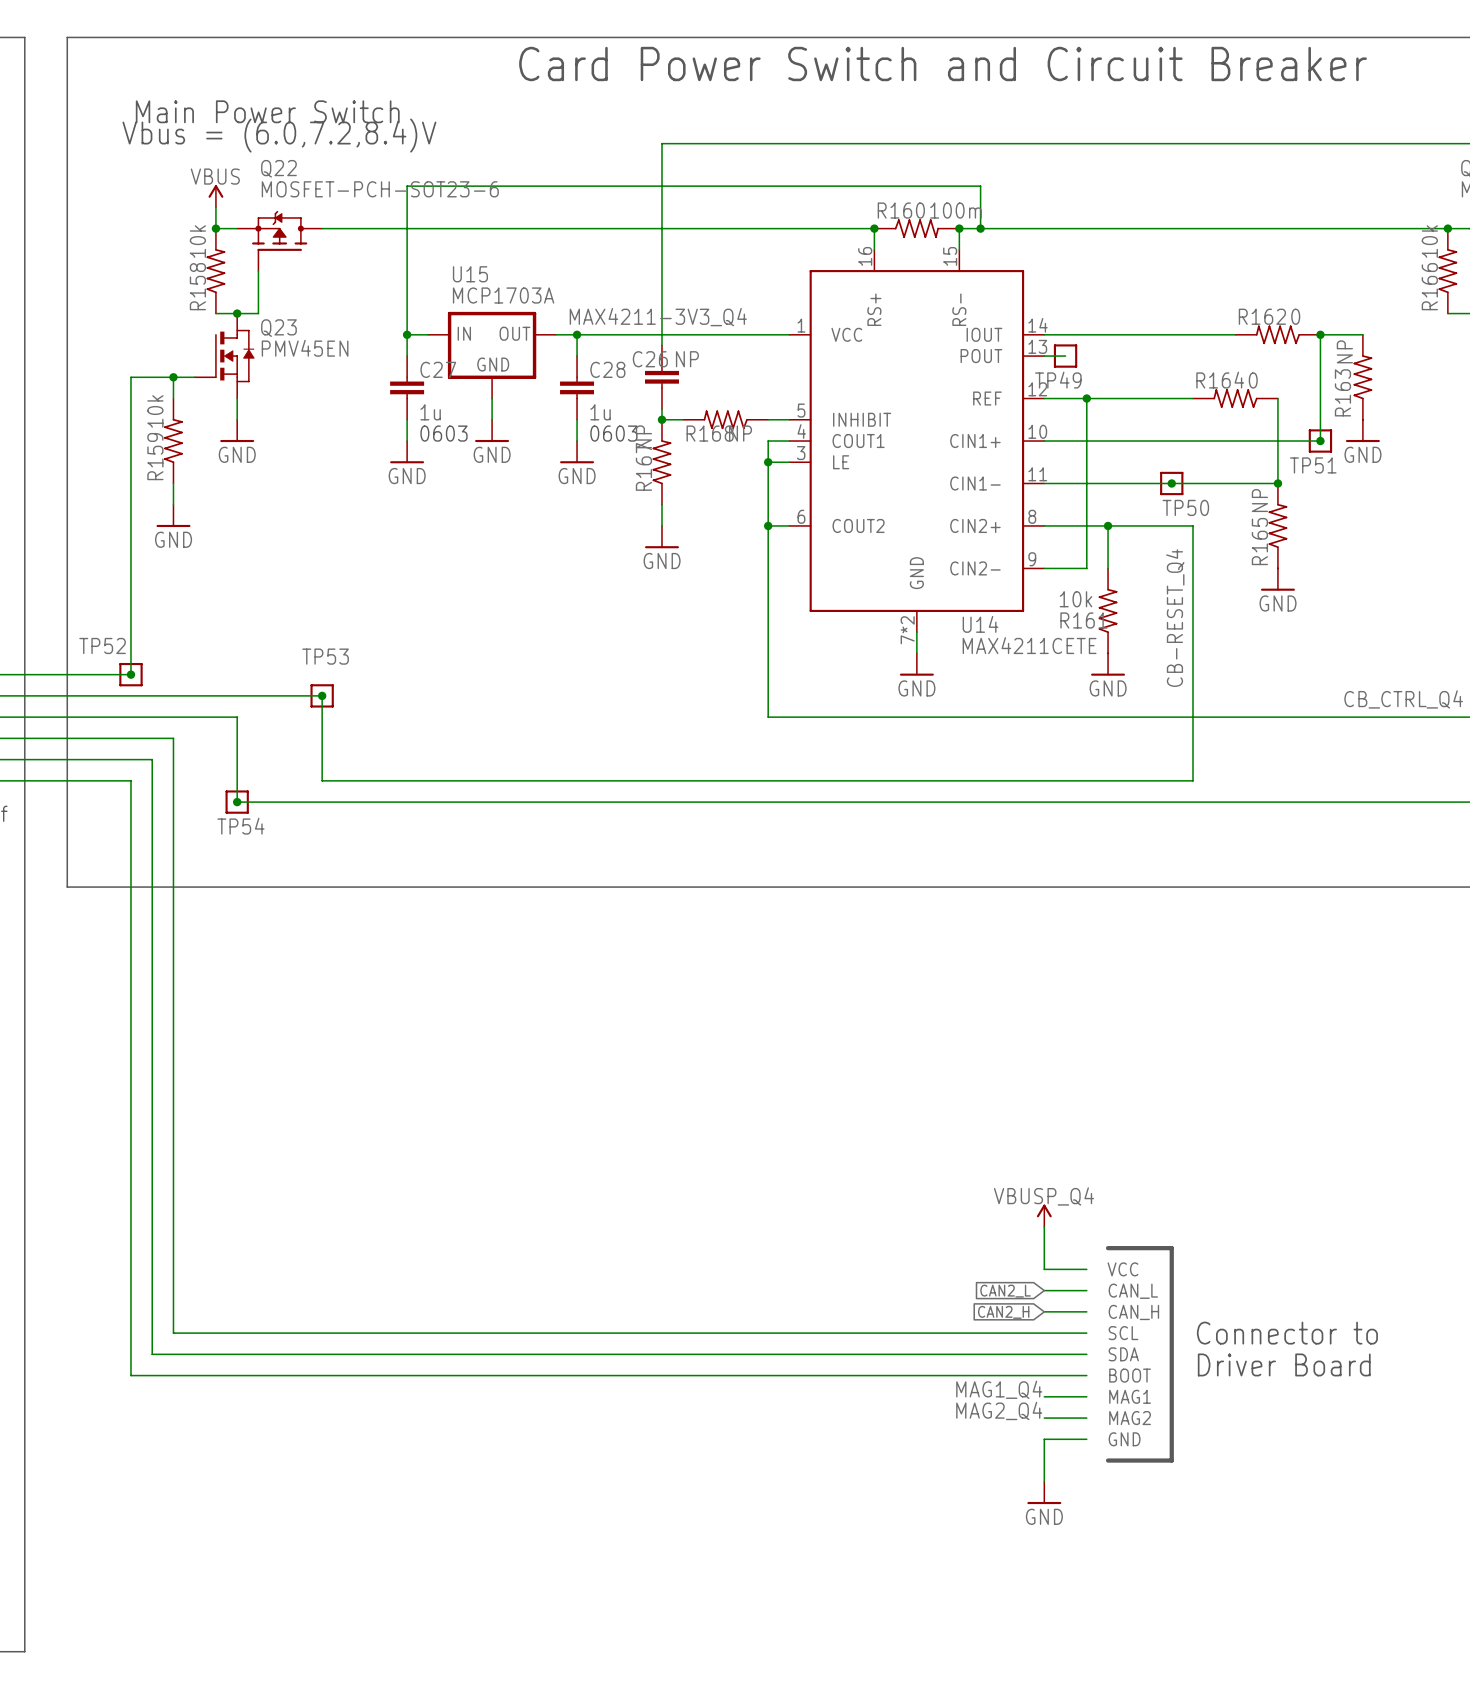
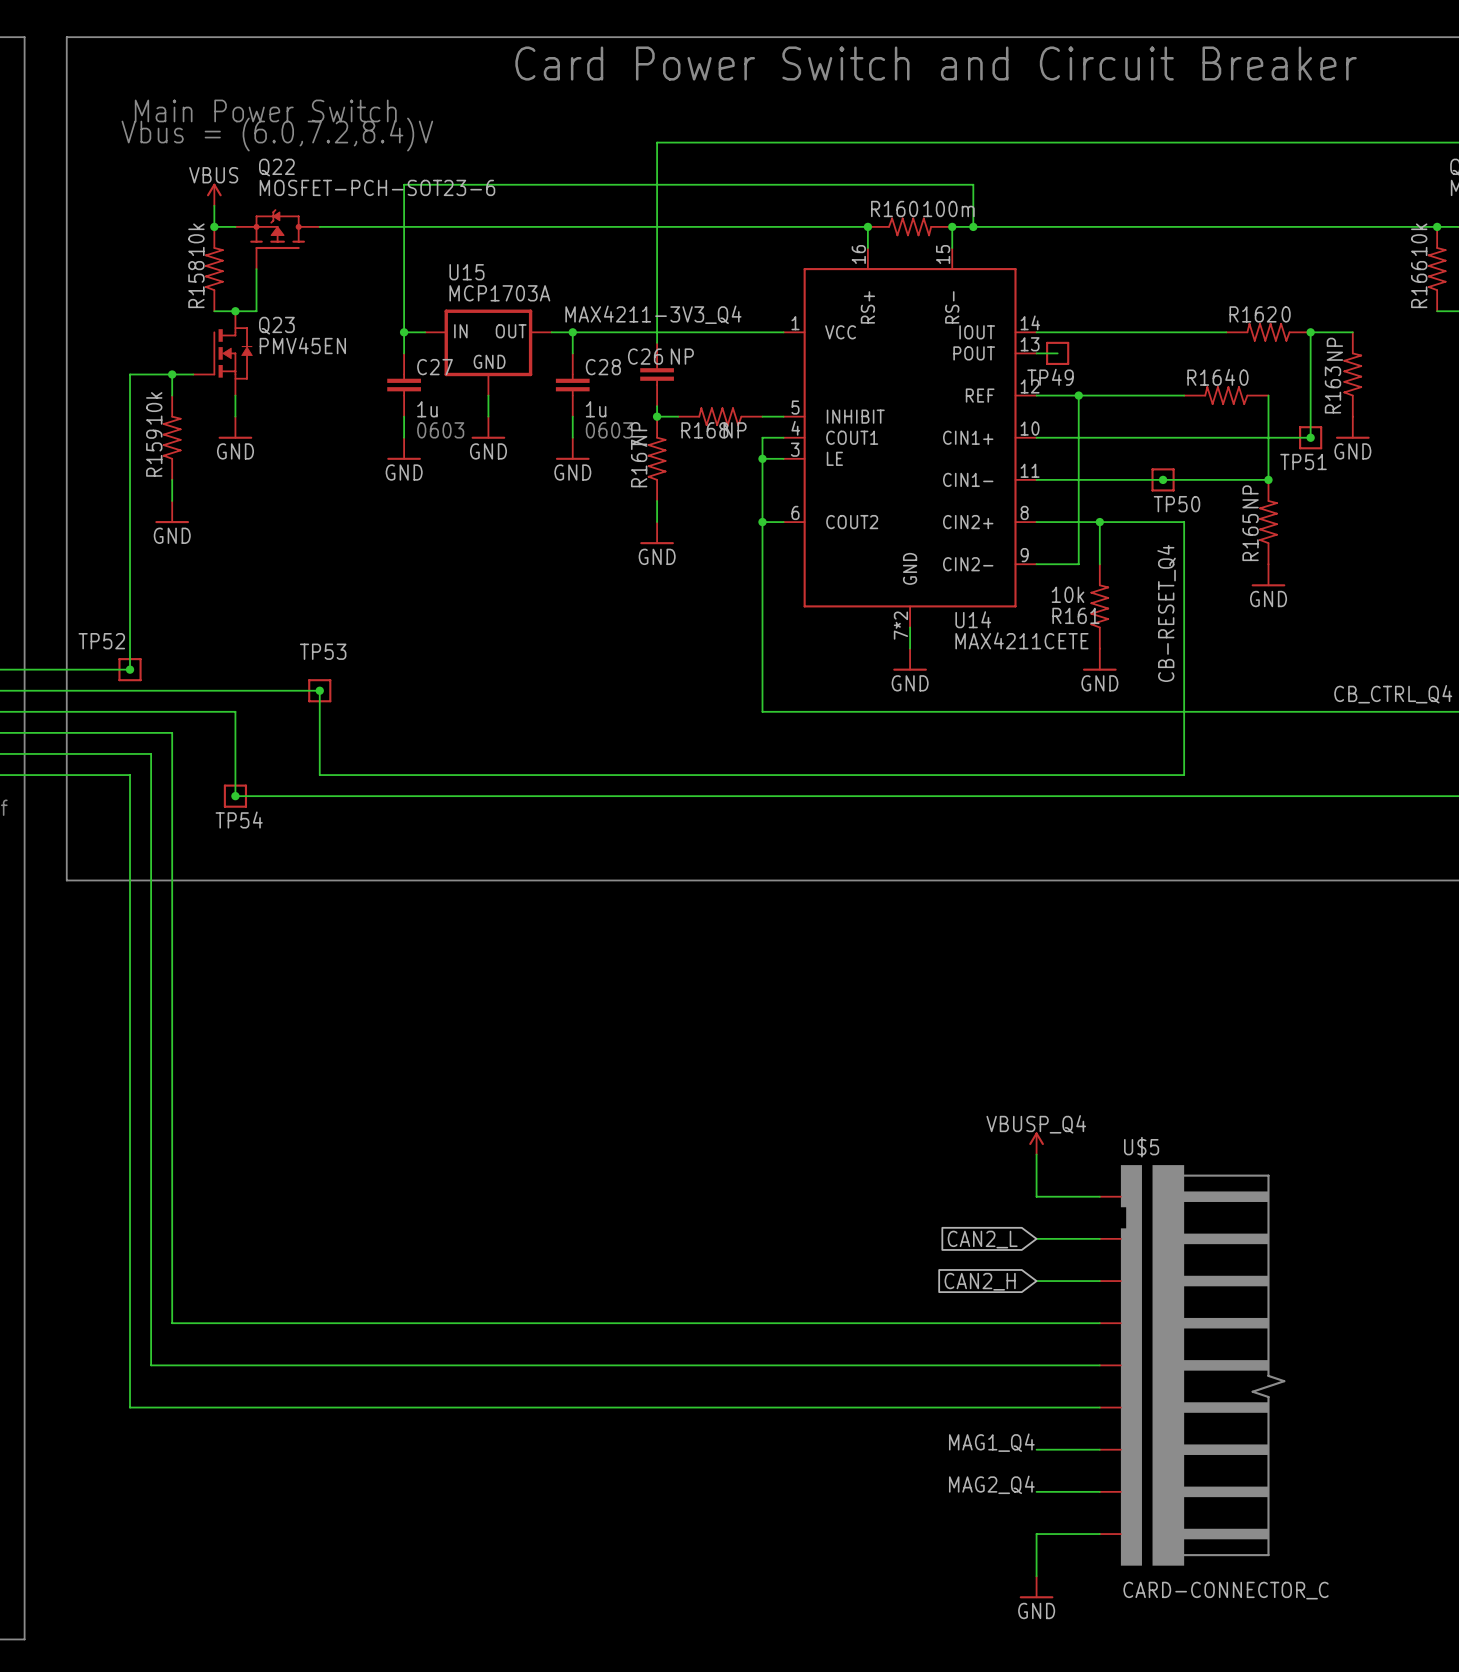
wire: none -> (1036, 1154) (1036, 1196) (1099, 1196)
power symbol position: VBUSP_Q4 (1044, 1215) -> VBUSP_Q4 (1036, 1143)
wire: (1044, 1226) (1044, 1269) (1086, 1269) -> none
global label: none -> CAN2_L (982, 1239)
wire: none -> (1036, 1238) (1099, 1238)
line: (1108, 1248) (1171, 1248) (1171, 1460) (1108, 1460) -> none
wire: none -> (1078, 1281) (1099, 1281)
global label: CAN2_L (1005, 1291) -> CAN2_H (980, 1281)
wire: (1044, 1311) (1086, 1311) -> none
global label: CAN2_H (1003, 1312) -> none
wire: none -> (1078, 1323) (1099, 1323)
text: Connector to (1287, 1333) -> none
wire: (152, 1354) (1086, 1354) -> none
part: (1133, 1354) -> none
text: Driver Board (1284, 1364) -> none
wire: (130, 1375) (152, 1375) -> (151, 1344) (151, 1365)
wire: none -> (130, 1365) (130, 1407) (1036, 1407)
wire: none -> (1078, 1365) (1099, 1365)
U$5: none -> CARD-CONNECTOR_C (1192, 1365)
label position: MAG1_Q4 (999, 1389) -> MAG1_Q4 (991, 1442)
wire: (1044, 1396) (1086, 1396) -> none
label position: MAG2_Q4 (999, 1410) -> MAG2_Q4 (991, 1484)
wire: none -> (1078, 1407) (1099, 1407)
wire: (1086, 1439) (1044, 1439) (1044, 1481) -> none
wire: none -> (1036, 1449) (1099, 1449)
power symbol position: GND (1044, 1492) -> GND (1036, 1587)
wire: none -> (1036, 1491) (1099, 1491)
wire: none -> (1099, 1534) (1036, 1534) (1036, 1576)

